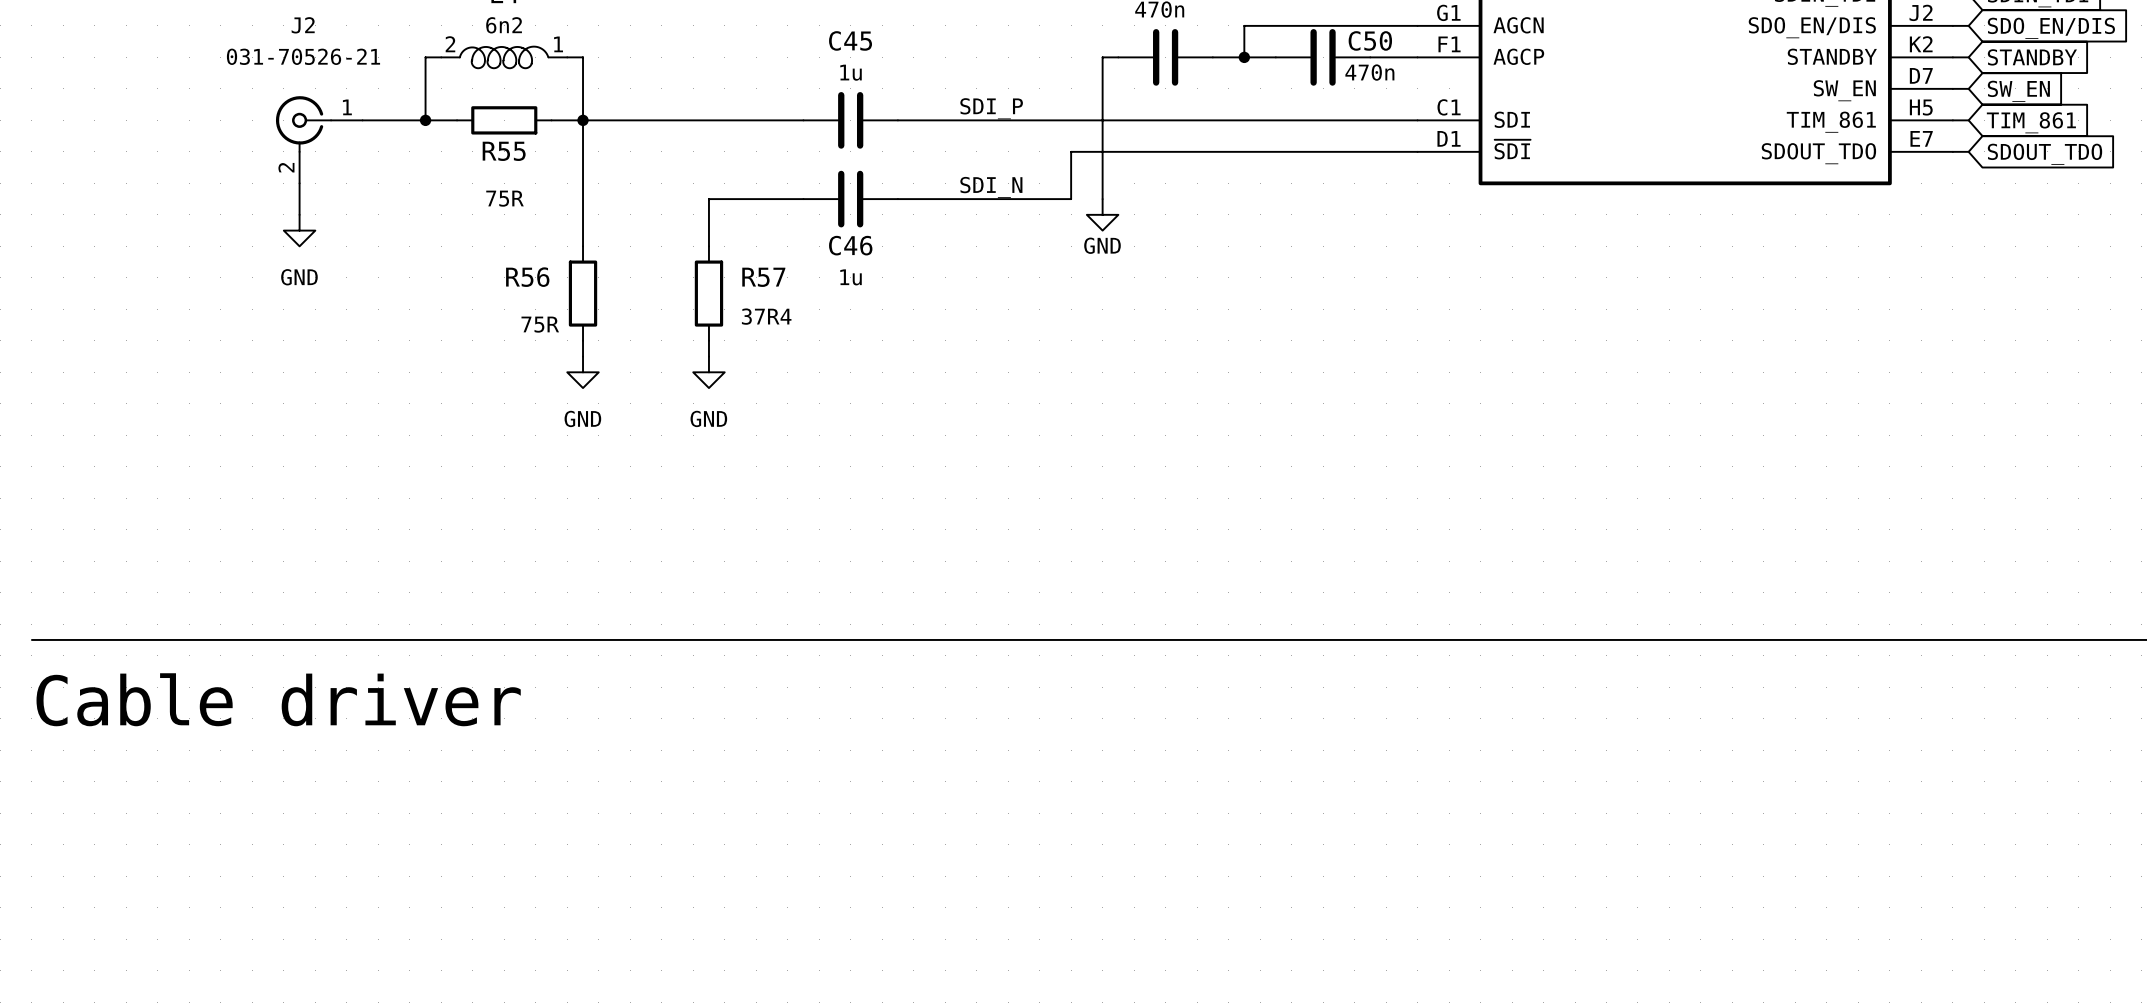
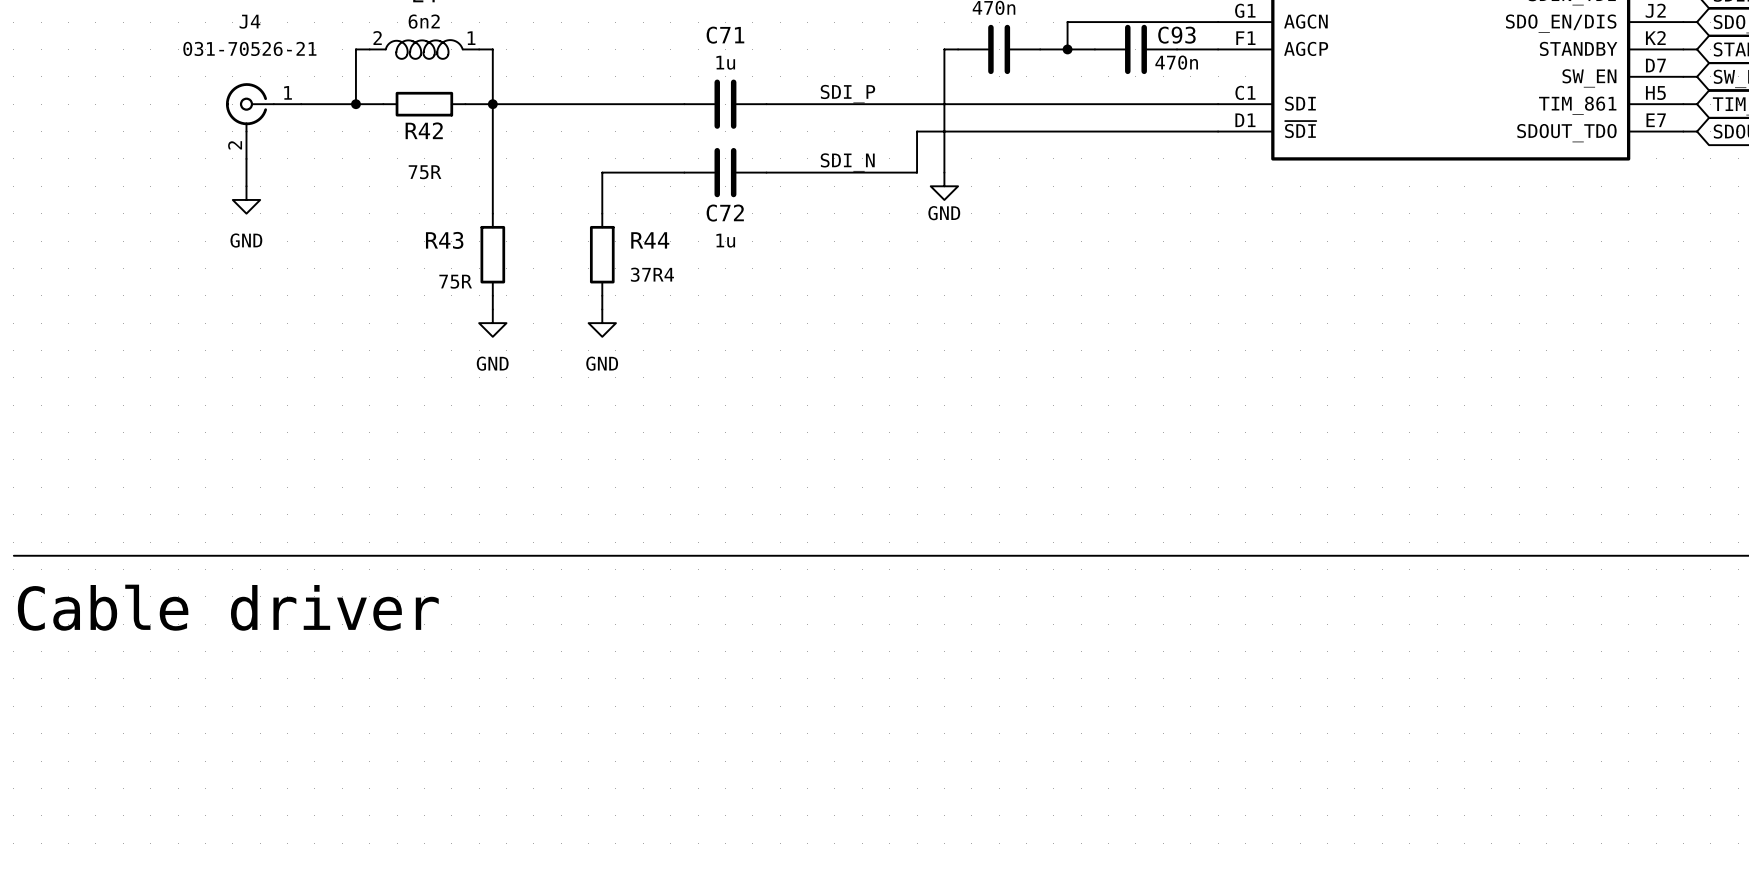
J2 name: J2 (303, 25) -> J4 (249, 21)
C45 name: C45 (850, 40) -> C71 (725, 35)
C50 name: C50 (1370, 40) -> C93 (1176, 35)
R55 name: R55 (504, 151) -> R42 (424, 130)
C46 name: C46 (850, 245) -> C72 (725, 213)
R56 name: R56 (527, 277) -> R43 (444, 240)
R57 name: R57 (763, 277) -> R44 (650, 240)

